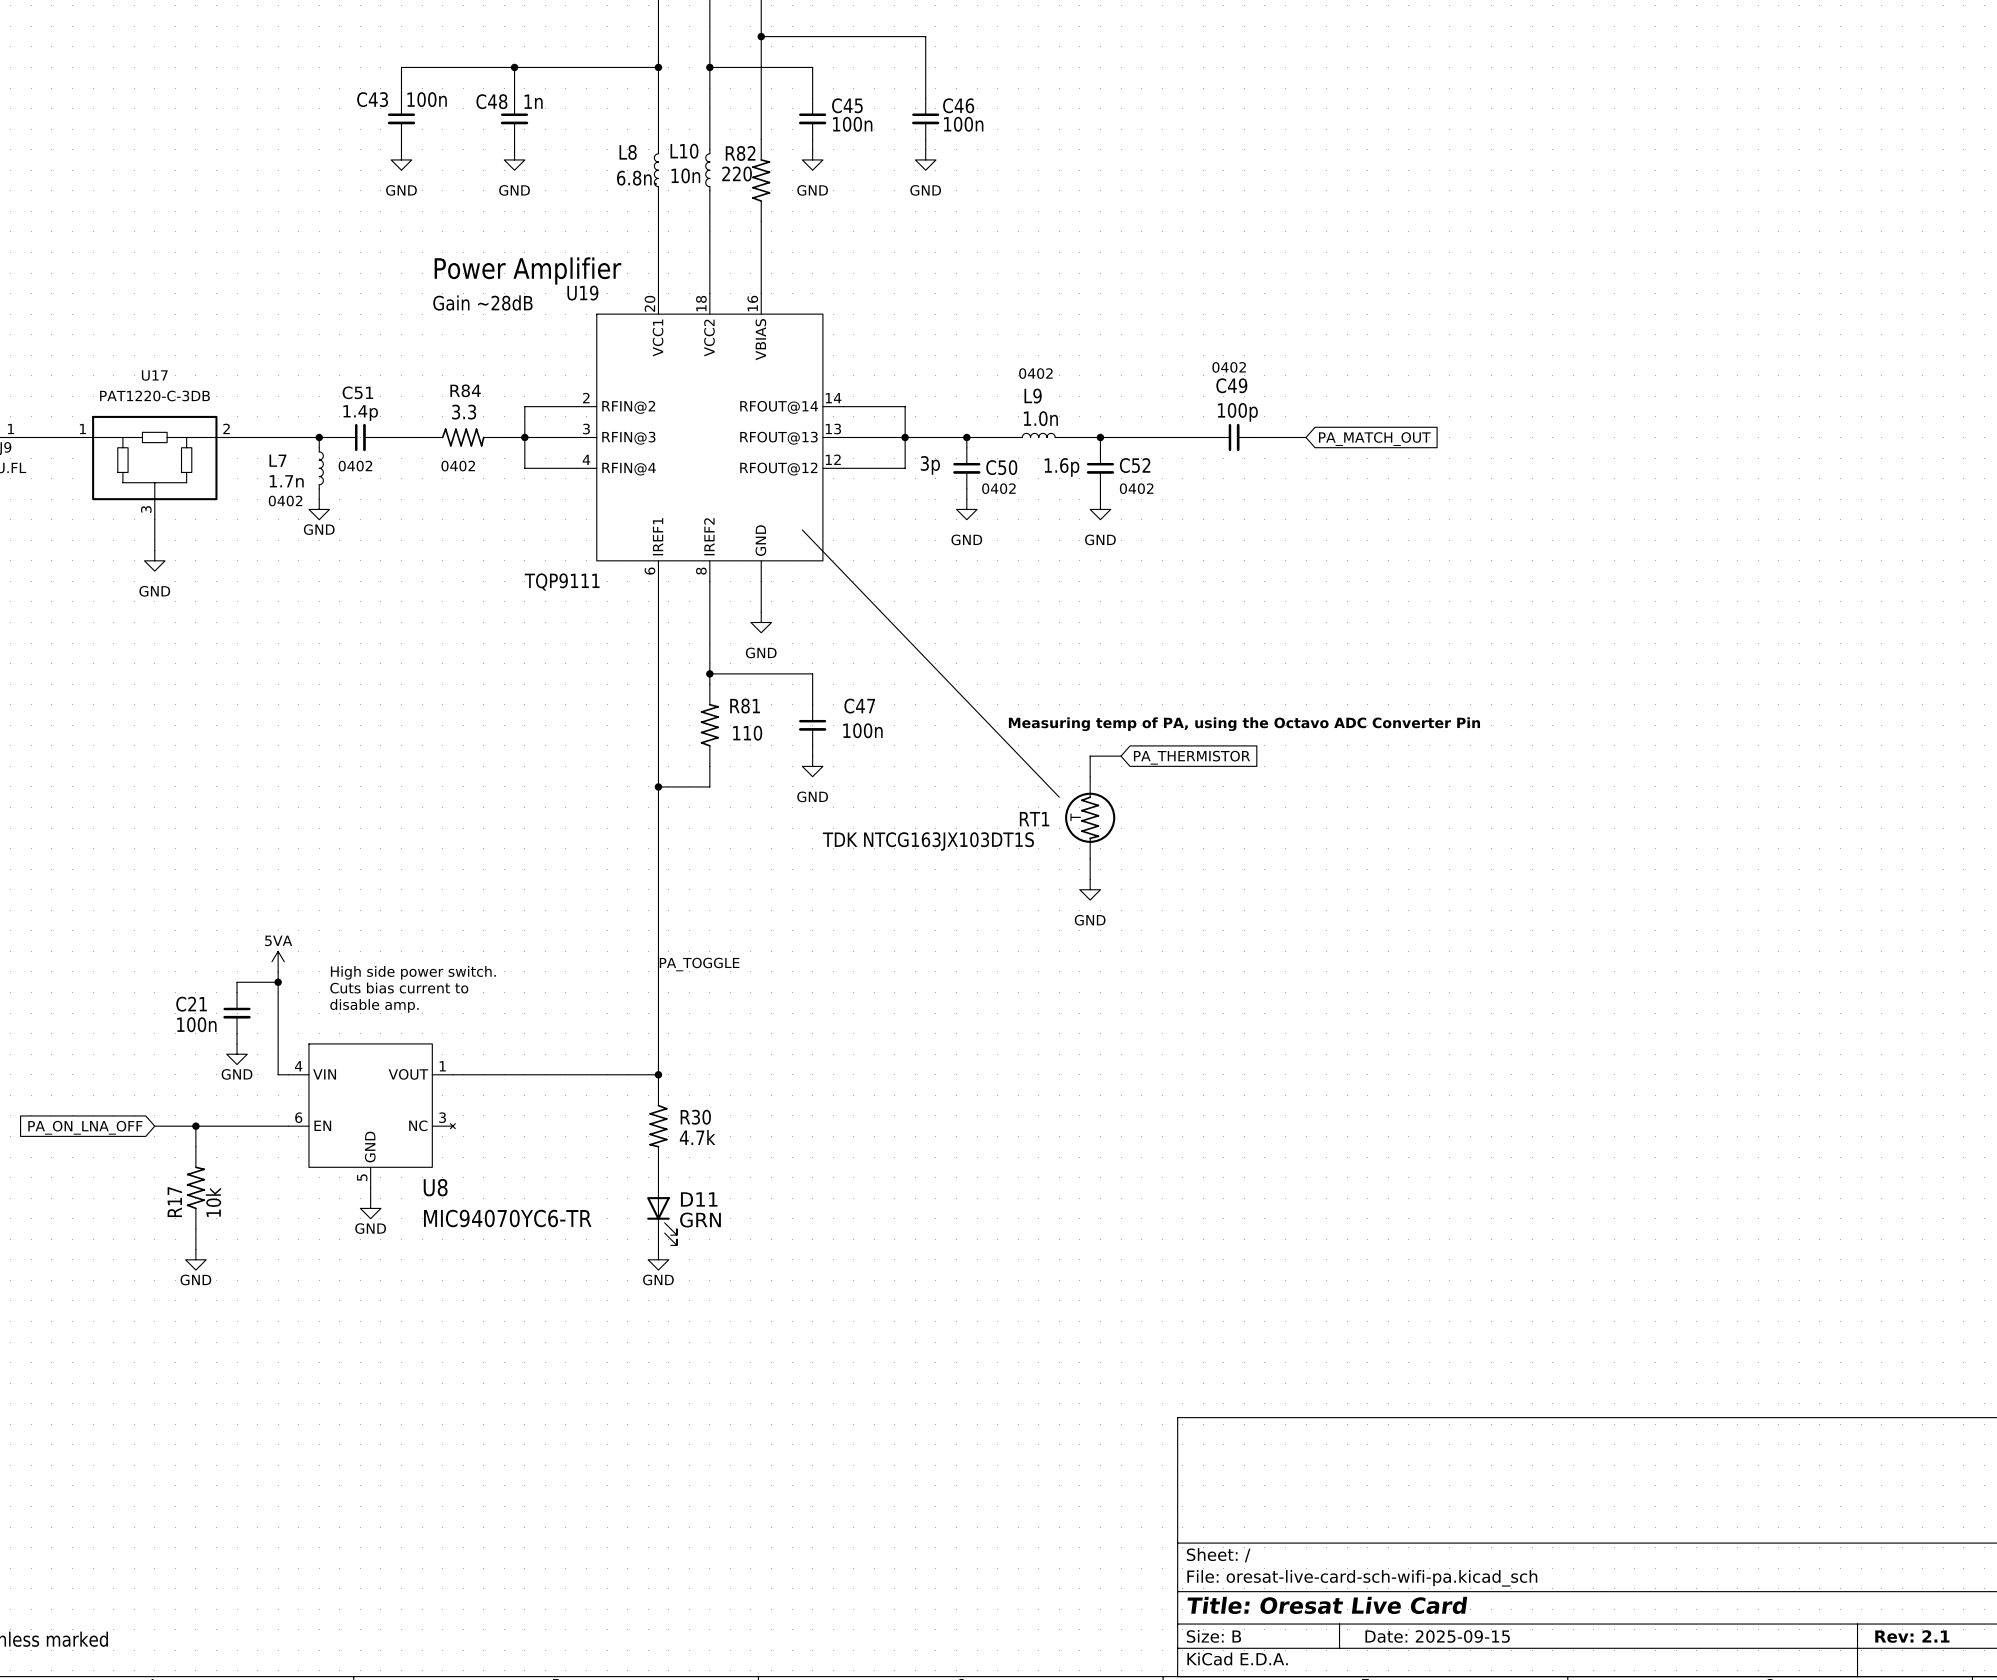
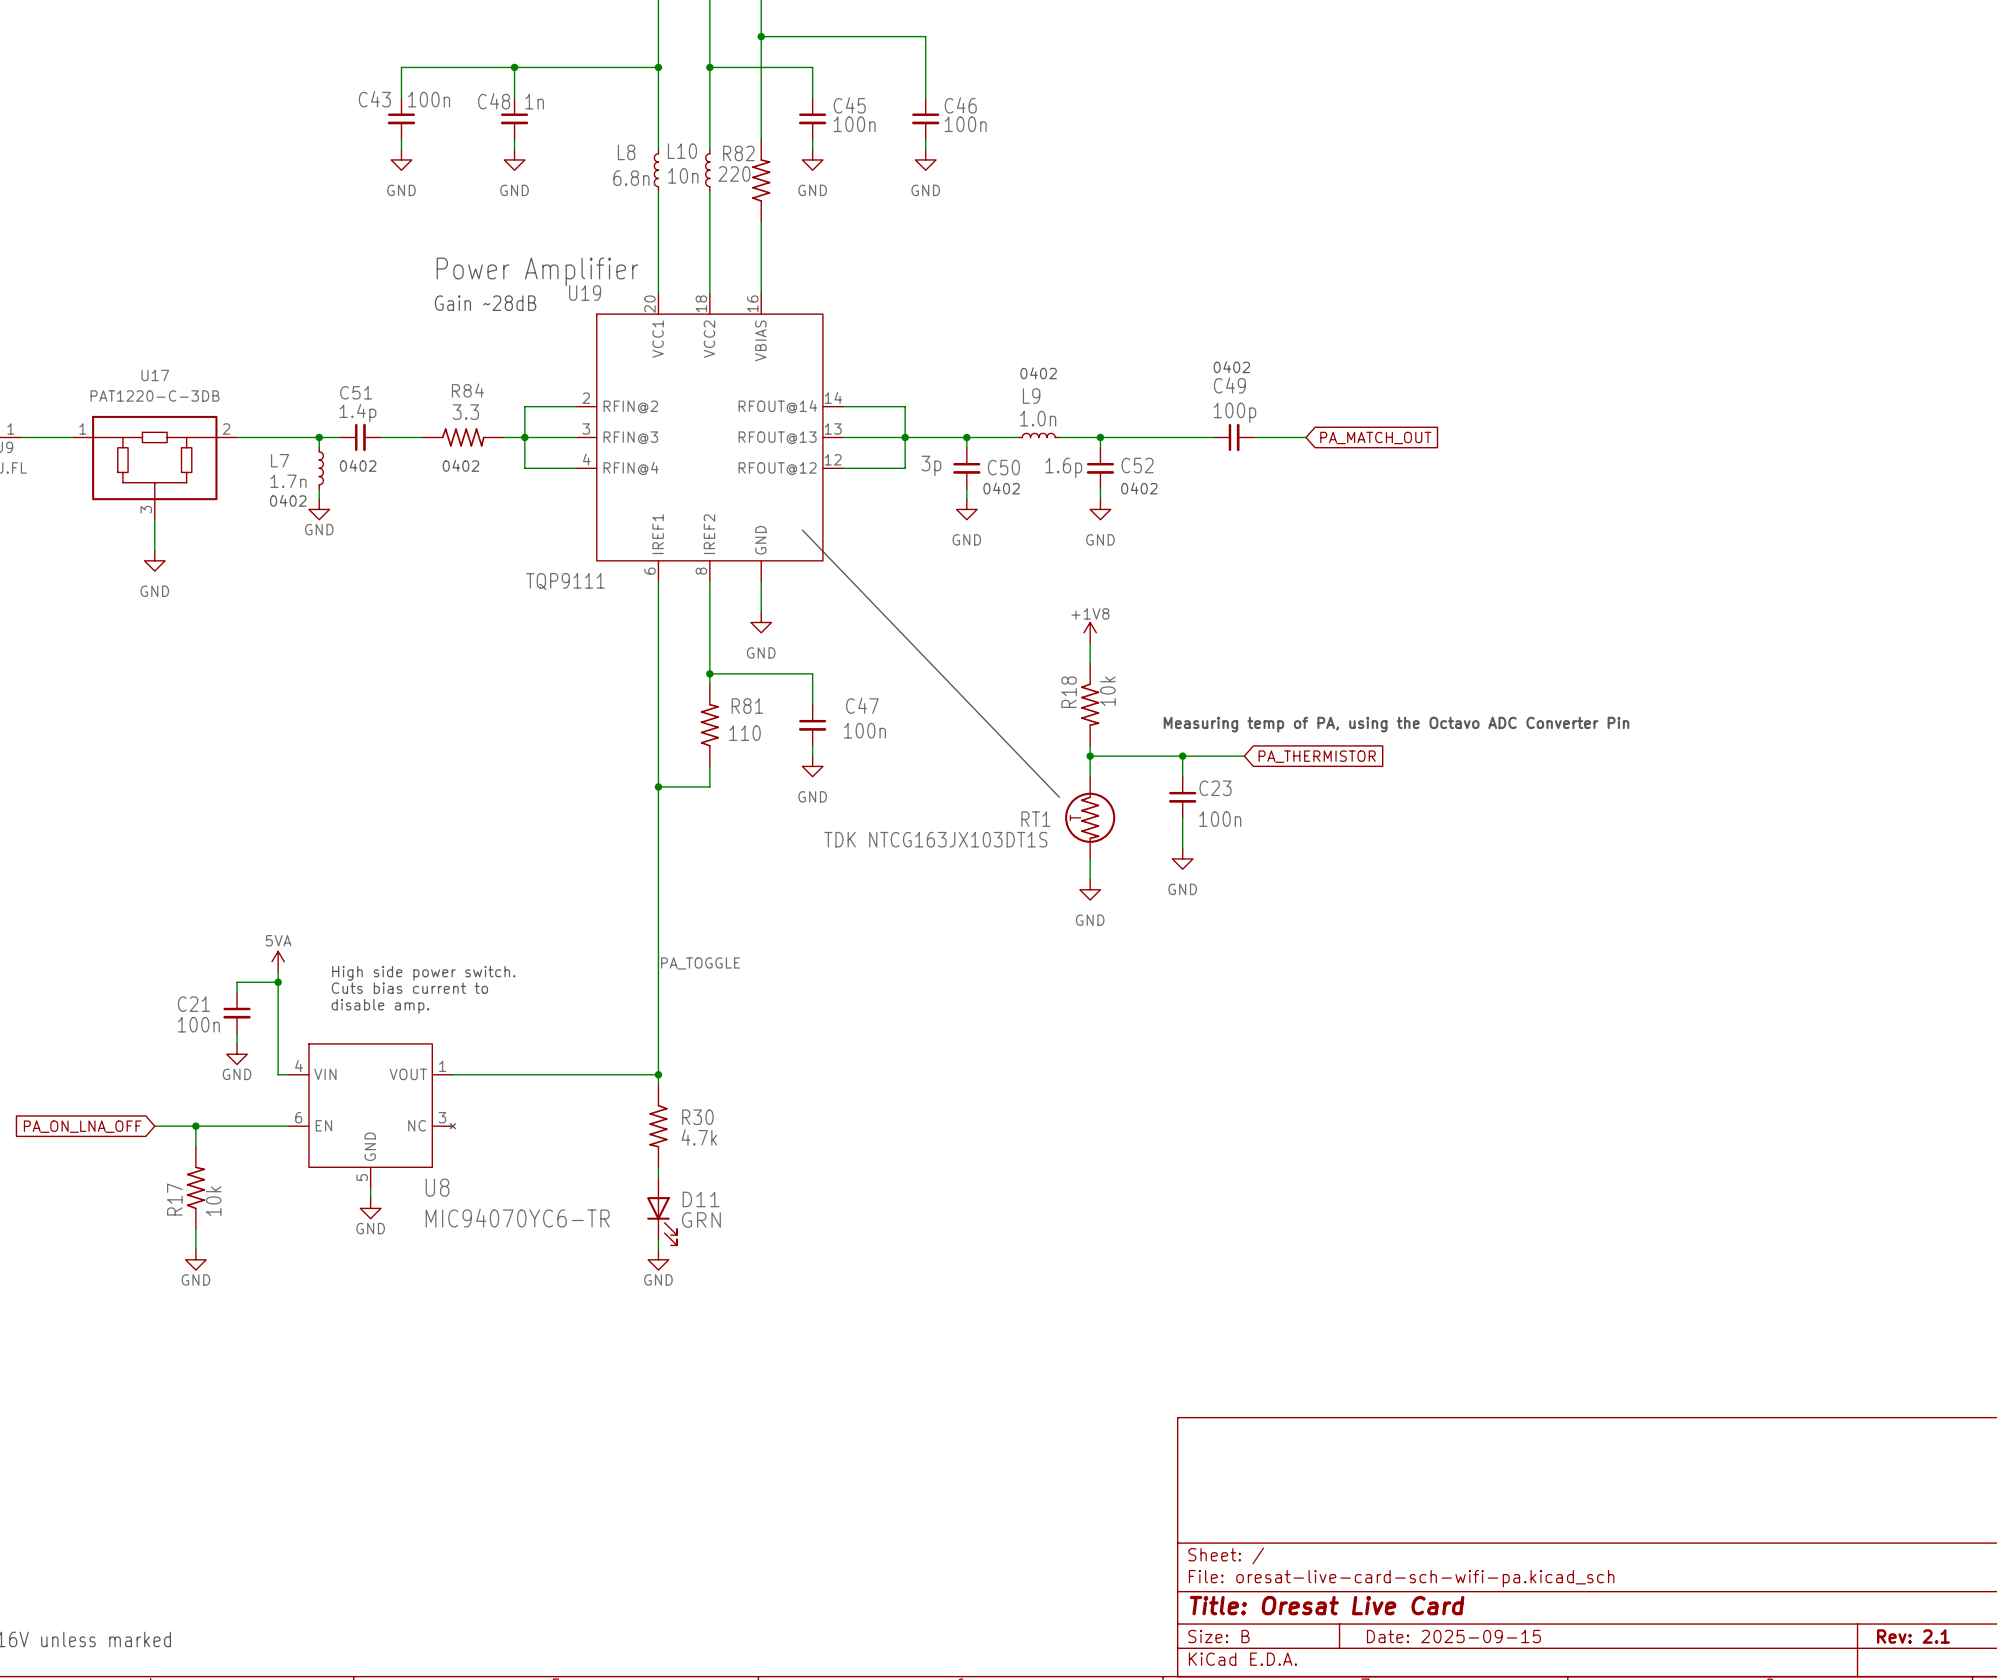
power symbol: none -> +1V8 (1090, 632)
wire: none -> (1090, 643) (1090, 663)
R18: none -> 10k (1090, 704)
text position: Measuring temp of PA, using the Octavo ADC Converter Pin (1244, 724) -> Measuring temp of PA, using the Octavo ADC Converter Pin (1396, 724)
wire: none -> (1090, 745) (1090, 756)
junction: none -> (1090, 756)
wire: none -> (1121, 756) (1244, 756)
wire: none -> (1182, 756) (1182, 776)
junction: none -> (1182, 756)
global label position: PA_THERMISTOR (1192, 757) -> PA_THERMISTOR (1317, 756)
C23: none -> 100n (1182, 797)
wire: none -> (1182, 817) (1182, 848)
power symbol: none -> GND (1182, 858)

